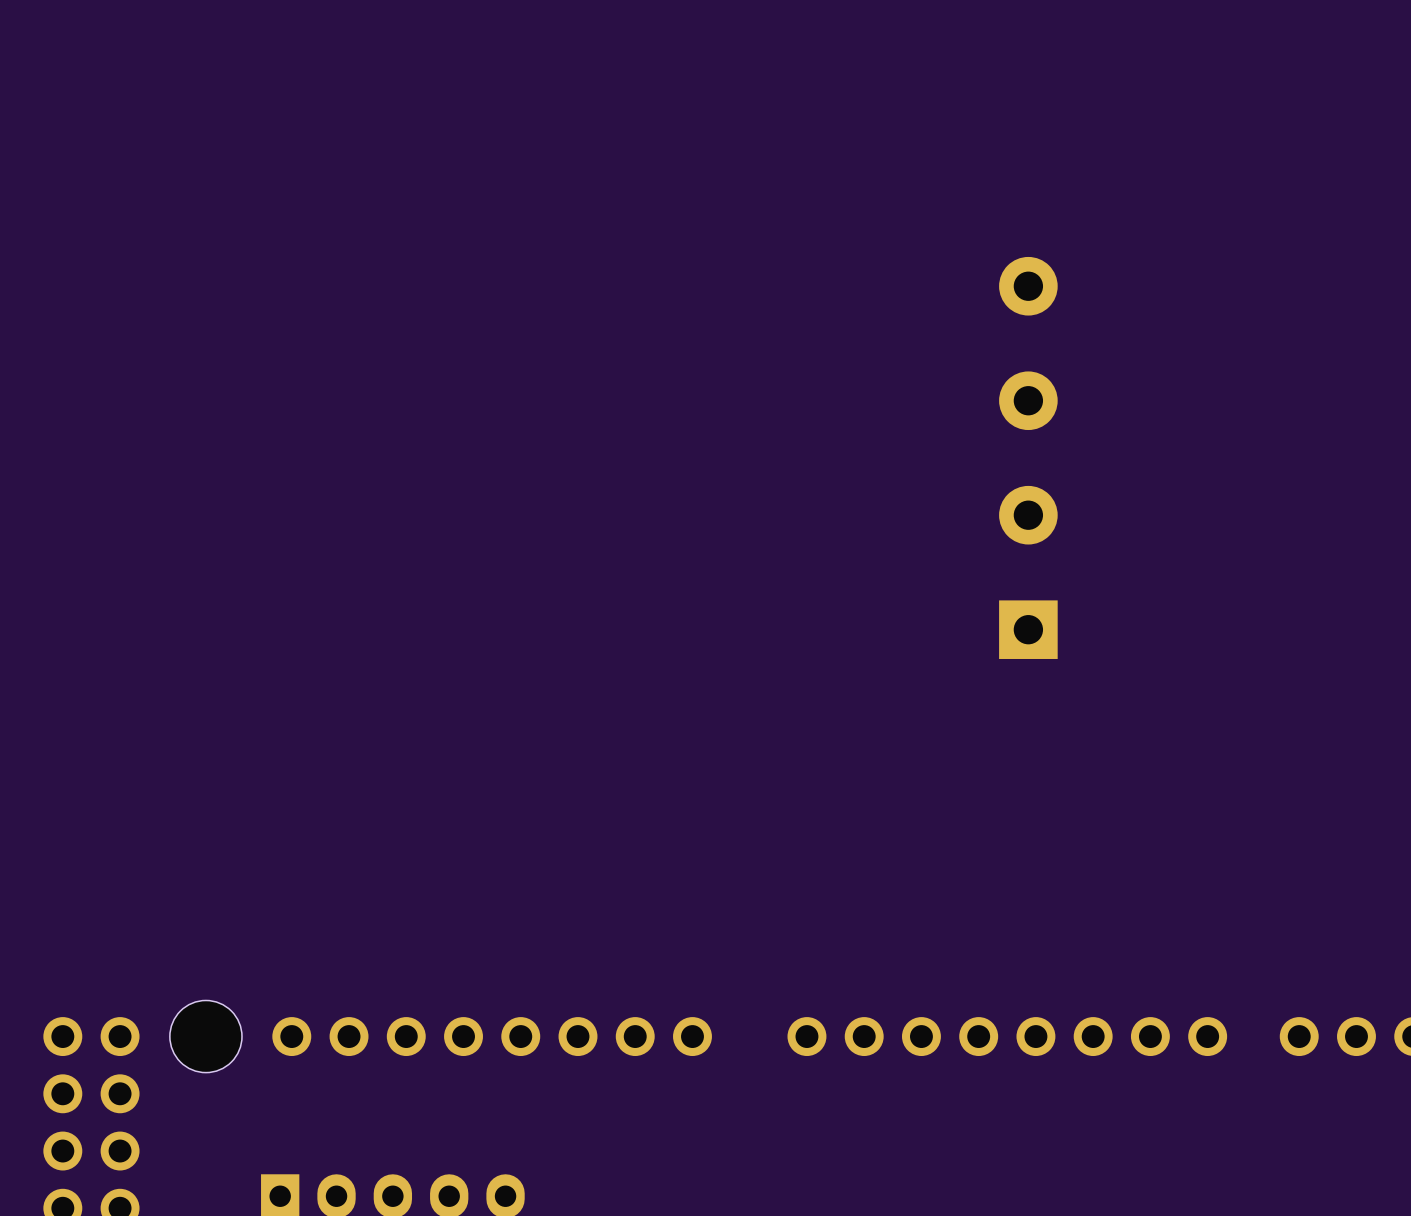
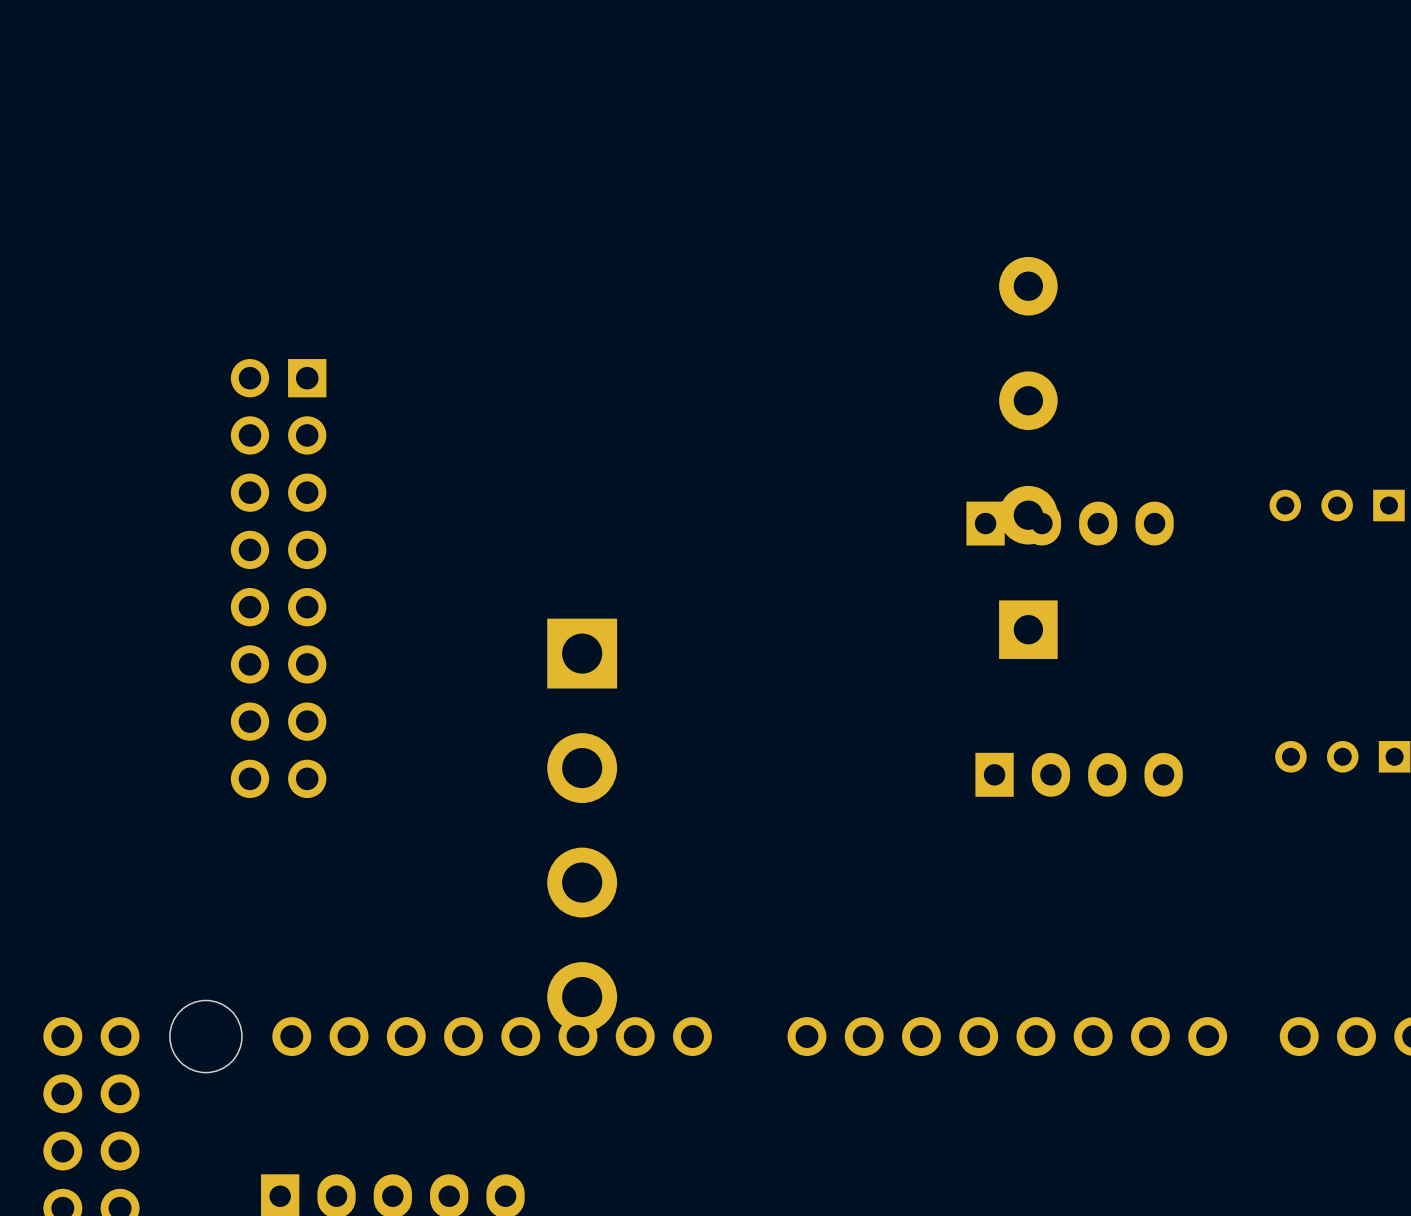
part: none -> (1337, 505)
part: none -> (1070, 523)
part: none -> (278, 578)
part: none -> (1342, 756)
part: none -> (1079, 774)
part: none -> (582, 825)

